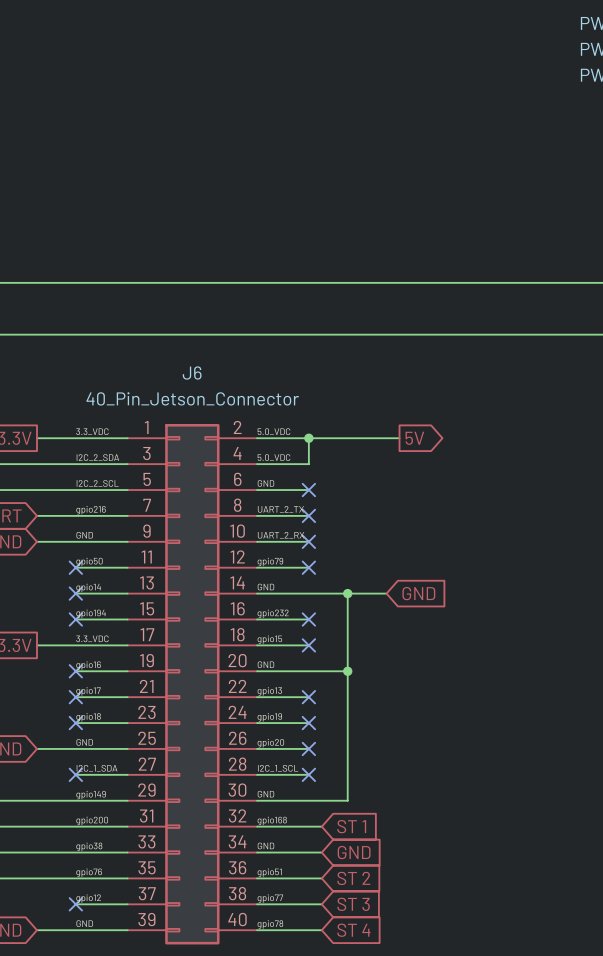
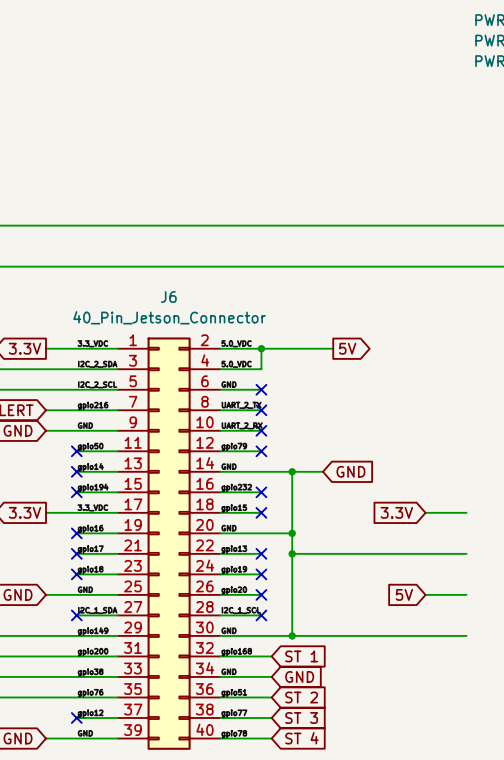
global label: none -> 3.3V (396, 512)
wire: none -> (425, 512) (466, 512)
wire: none -> (292, 553) (466, 553)
junction: none -> (292, 553)
wire: none -> (425, 594) (466, 594)
global label: none -> 5V (404, 594)
wire: none -> (292, 635) (466, 635)
junction: none -> (292, 635)

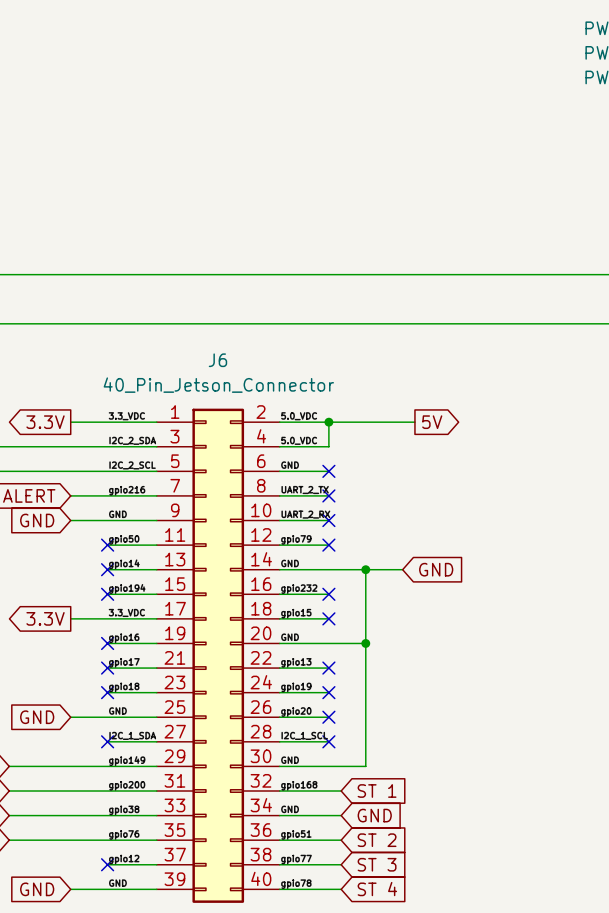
global label: 3.3V (396, 512) -> none
wire: (425, 512) (466, 512) -> none
wire: (292, 553) (466, 553) -> none
junction: (292, 553) -> none
global label: 5V (404, 594) -> none
wire: (425, 594) (466, 594) -> none
wire: (292, 635) (466, 635) -> none
junction: (292, 635) -> none

